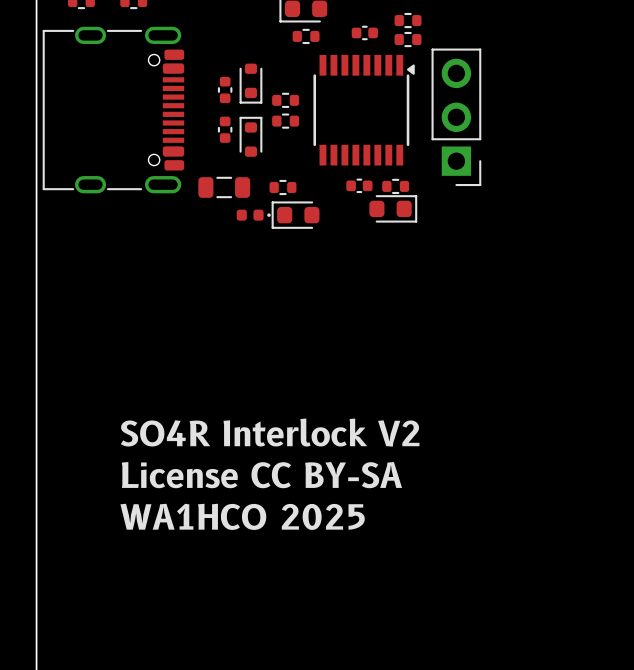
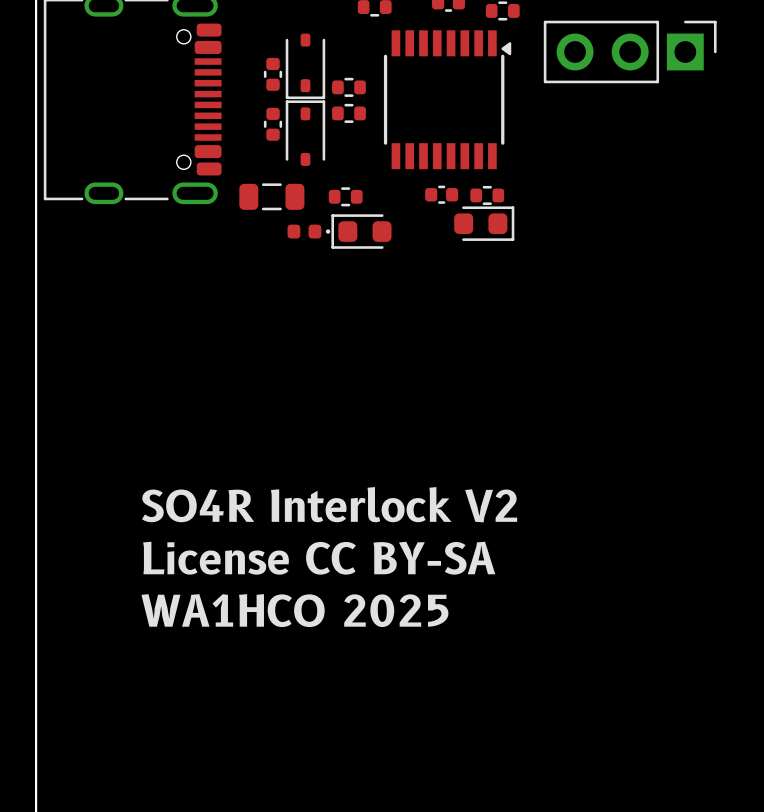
part footprint: [239, 63, 263, 104] -> [285, 33, 326, 100]
part footprint: [239, 116, 263, 157] -> [285, 100, 326, 166]
part rotation: 0° (456, 117) -> 90° counterclockwise (630, 51)

